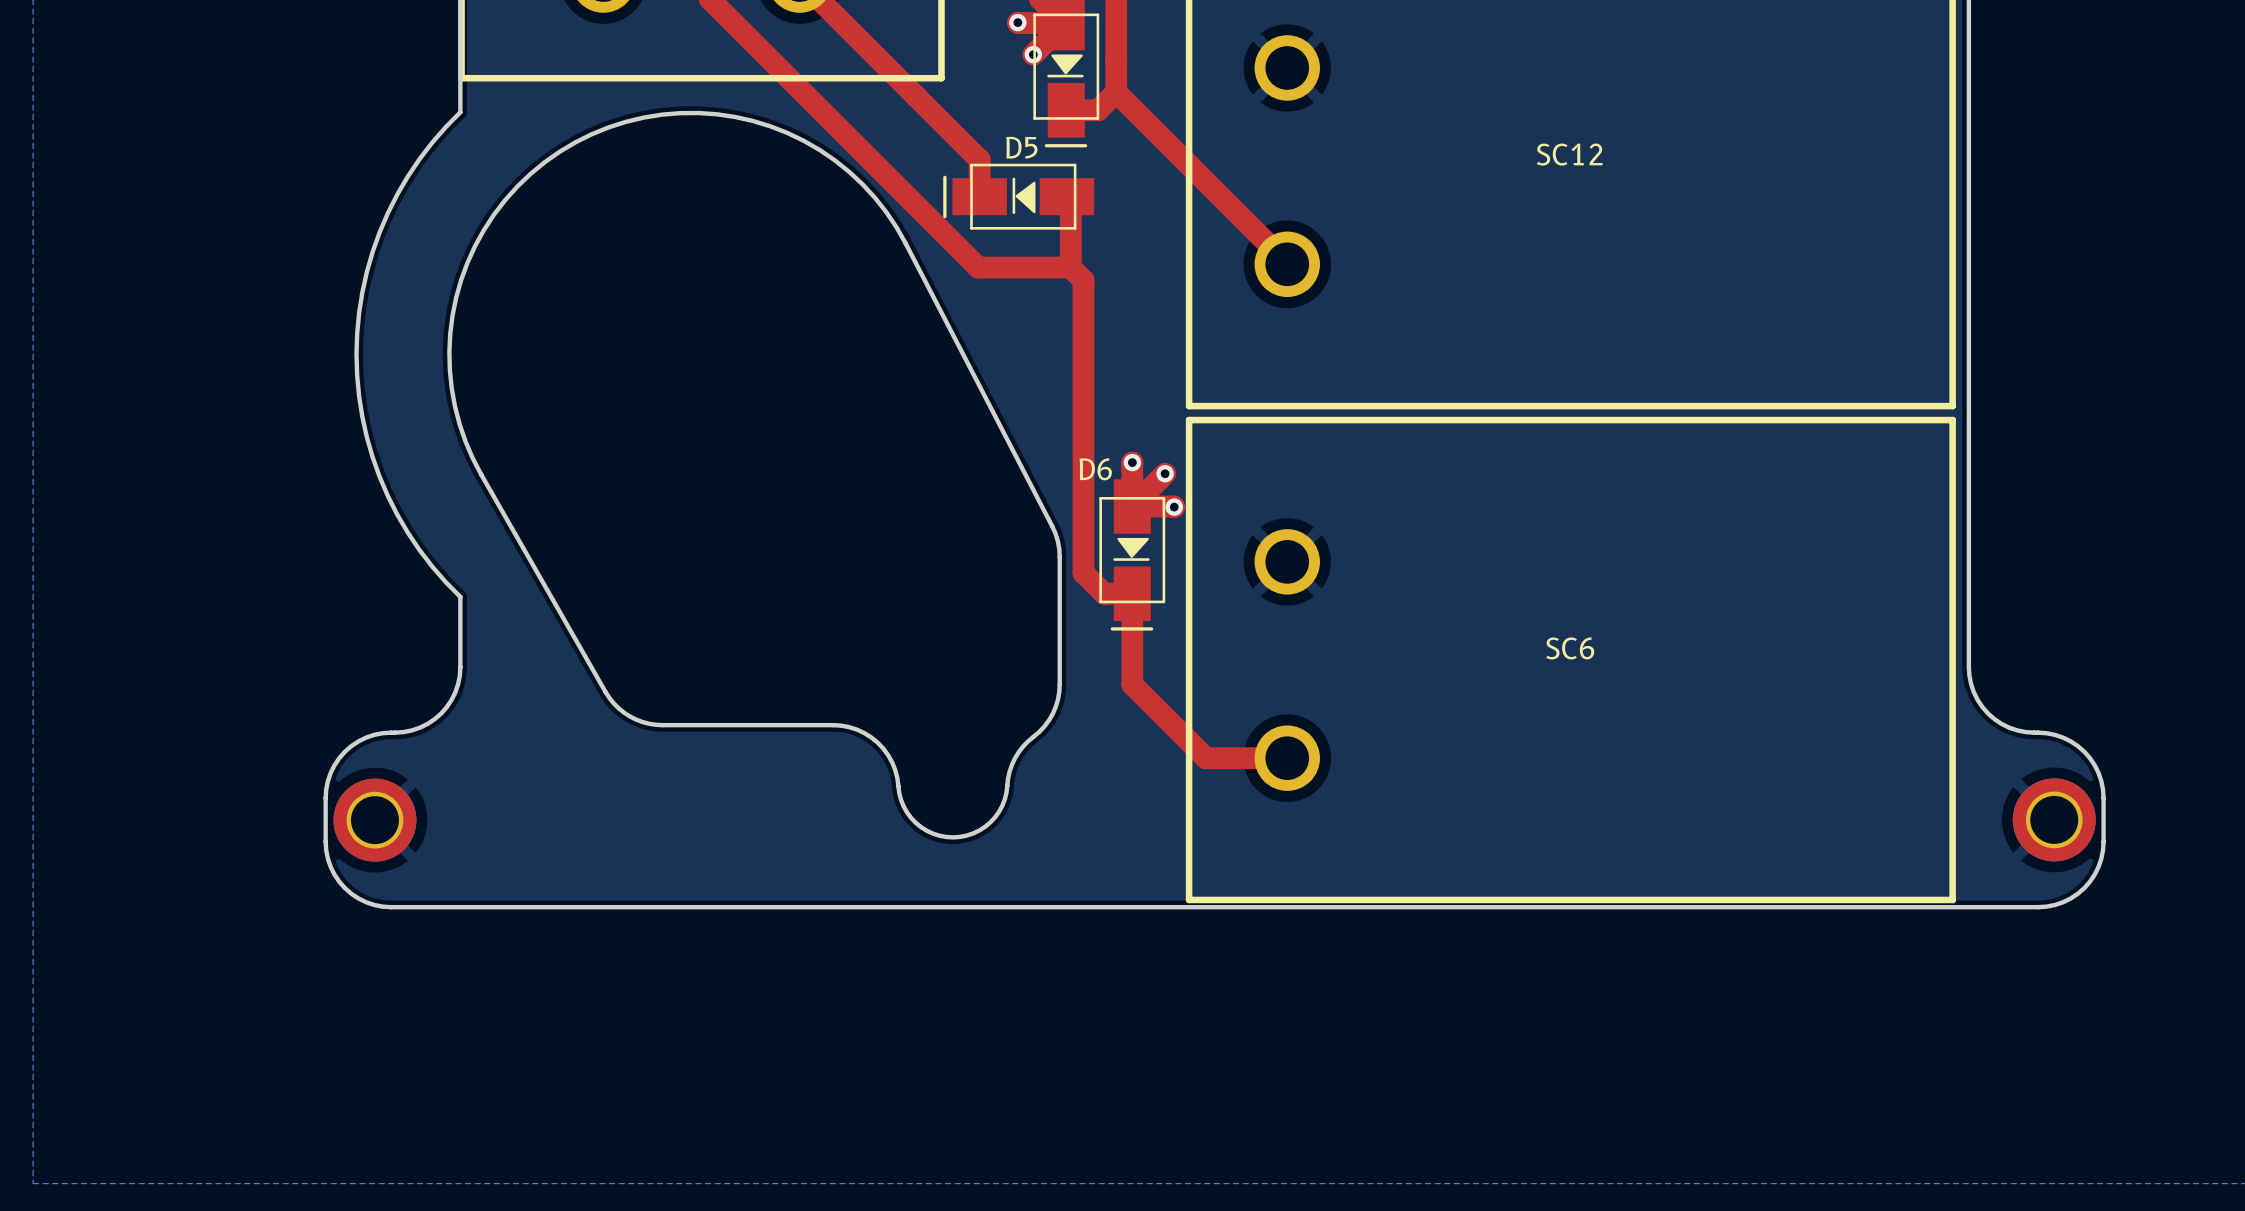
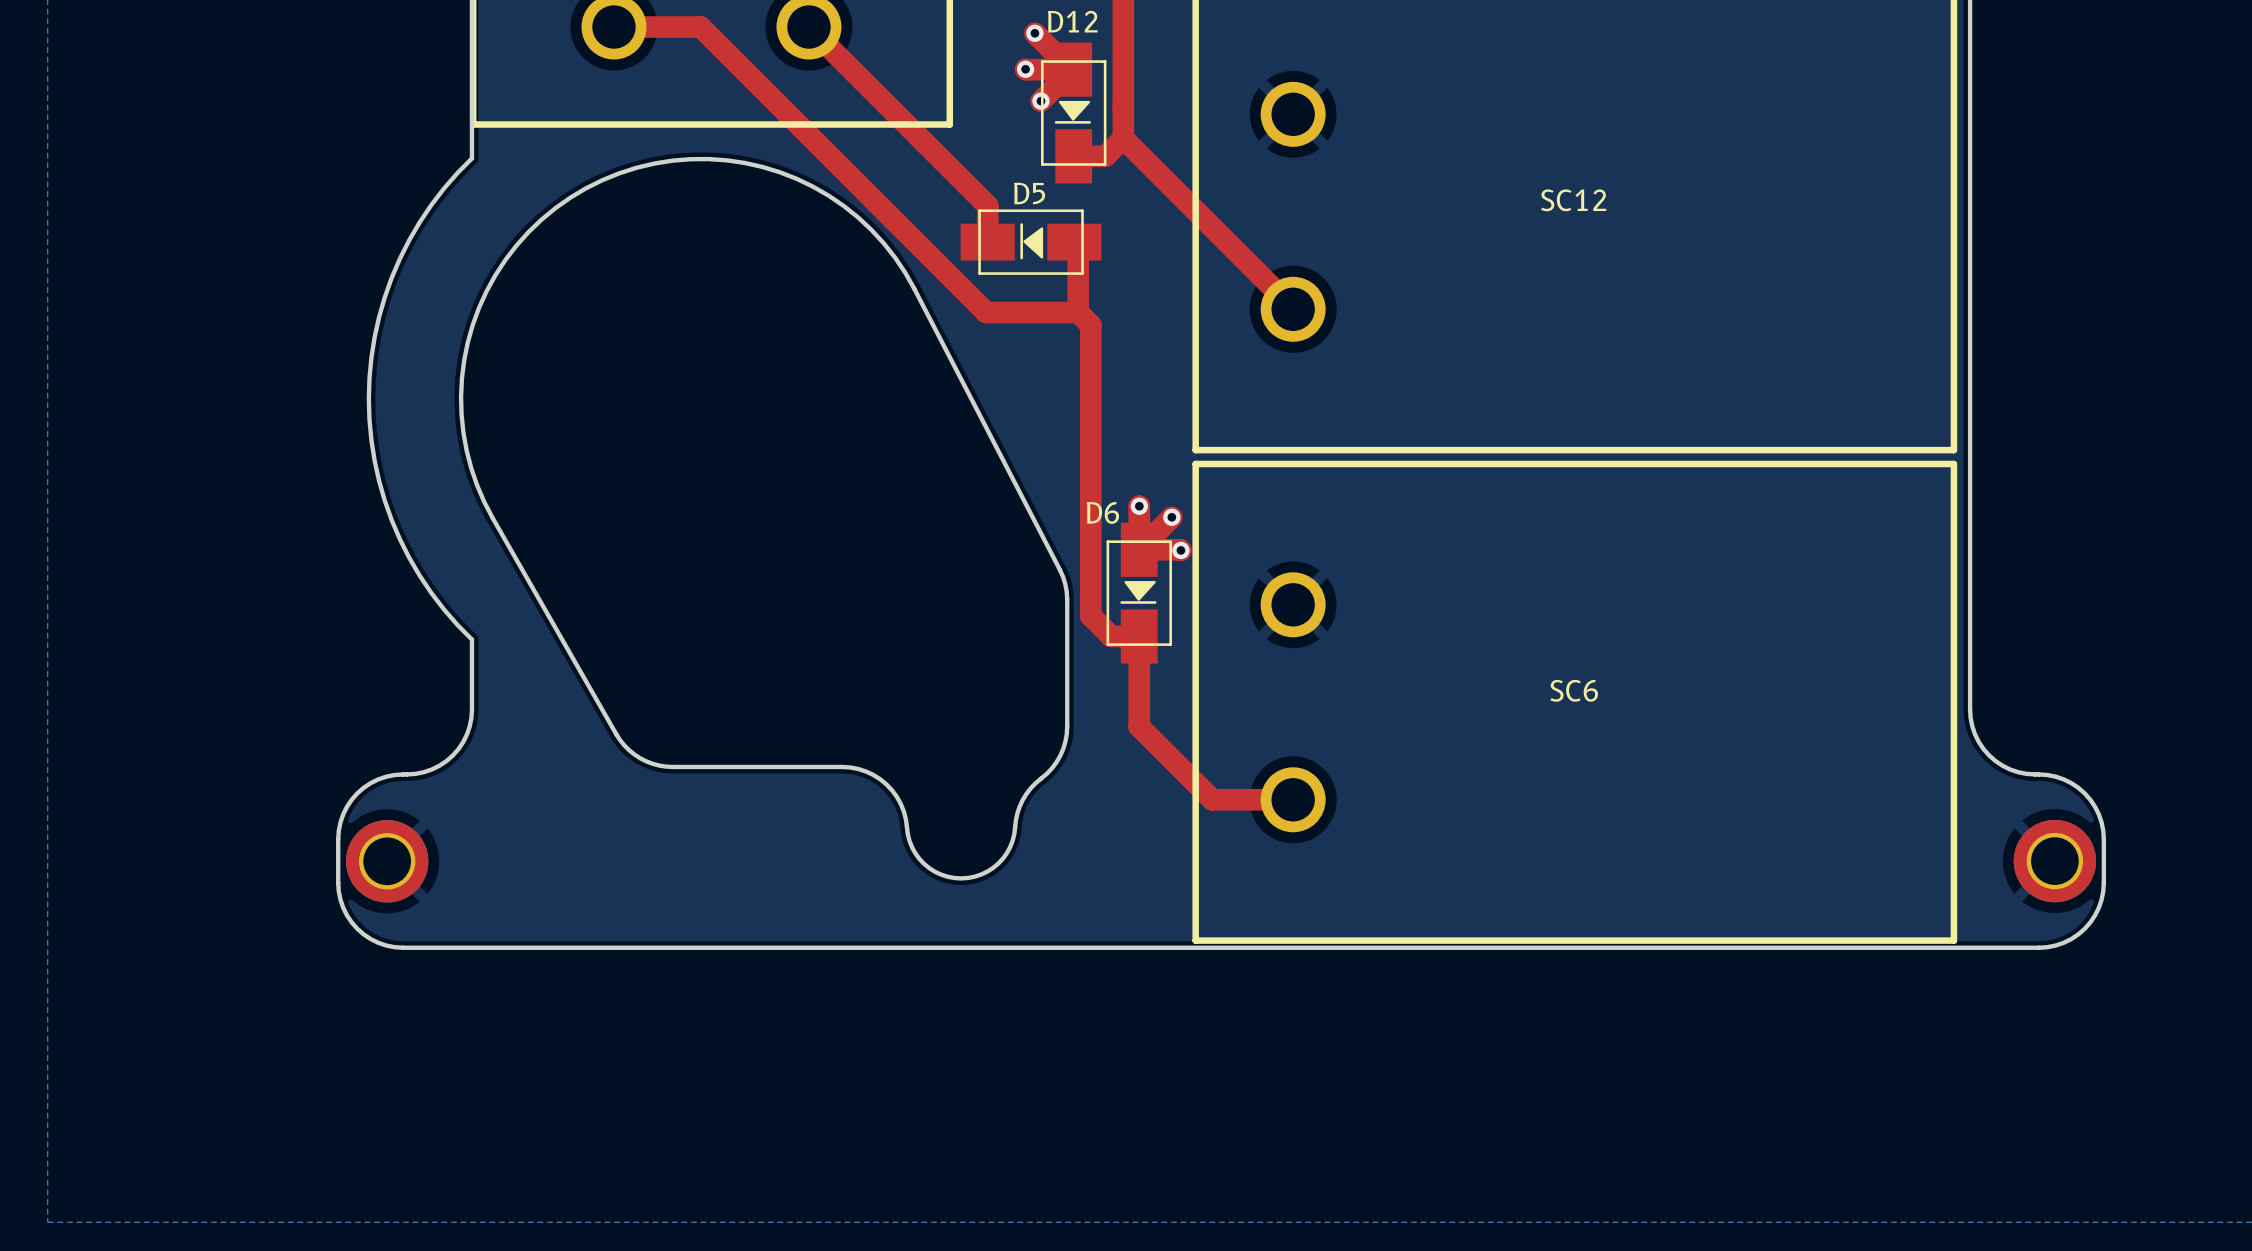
line: (1046, 145) (1085, 145) -> none
line: (944, 177) (944, 216) -> none
line: (1112, 628) (1151, 628) -> none

